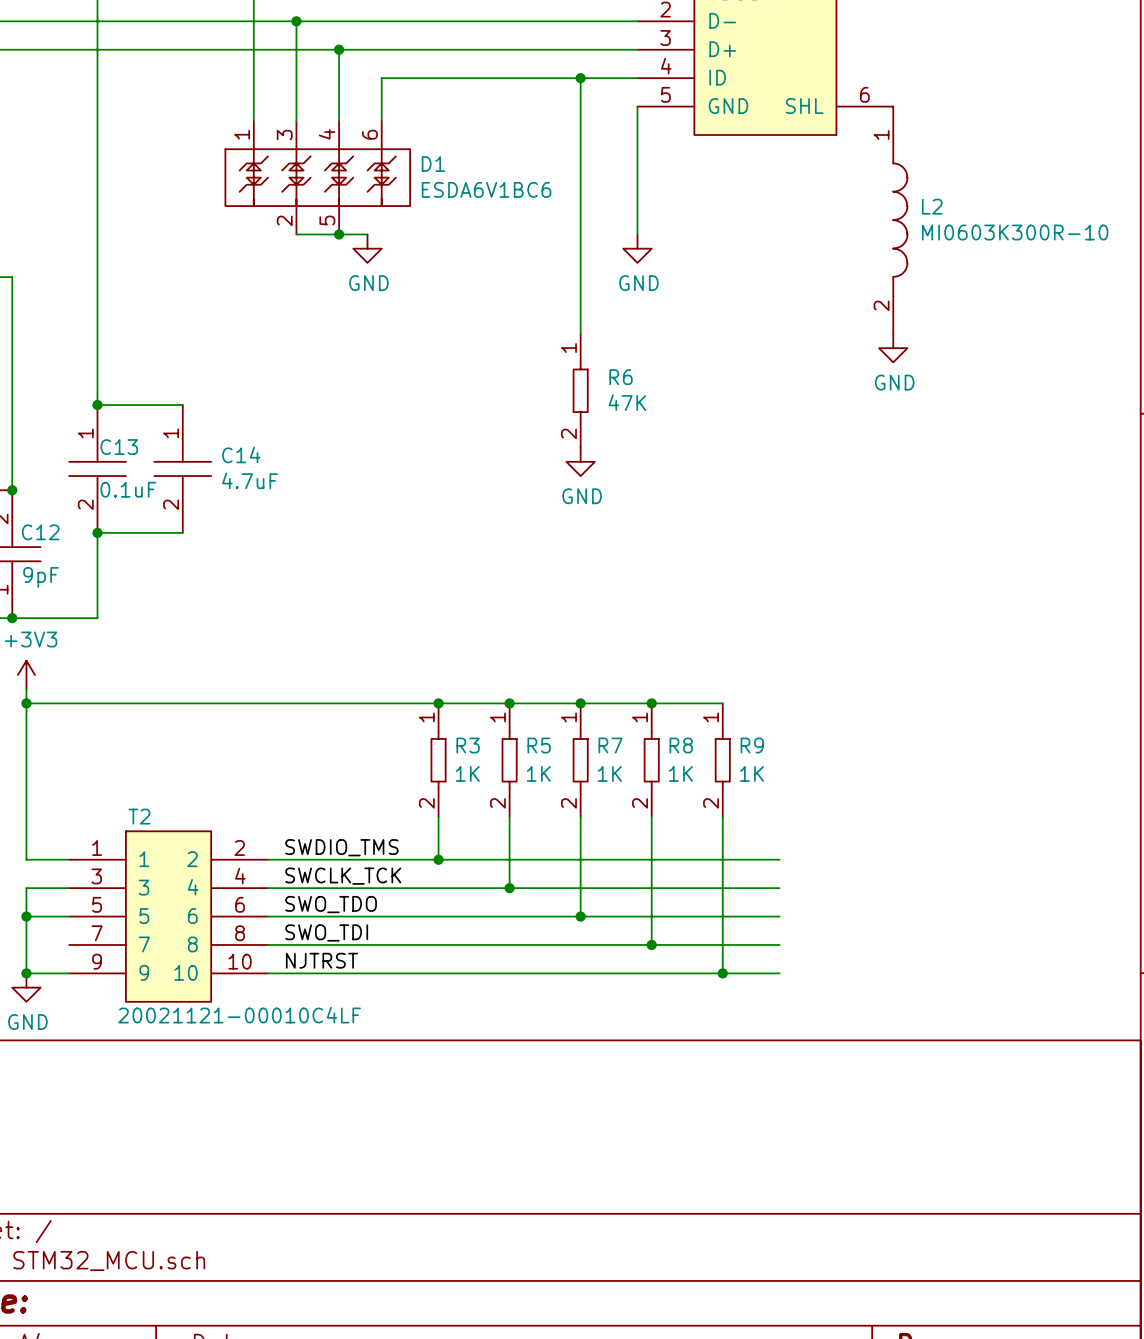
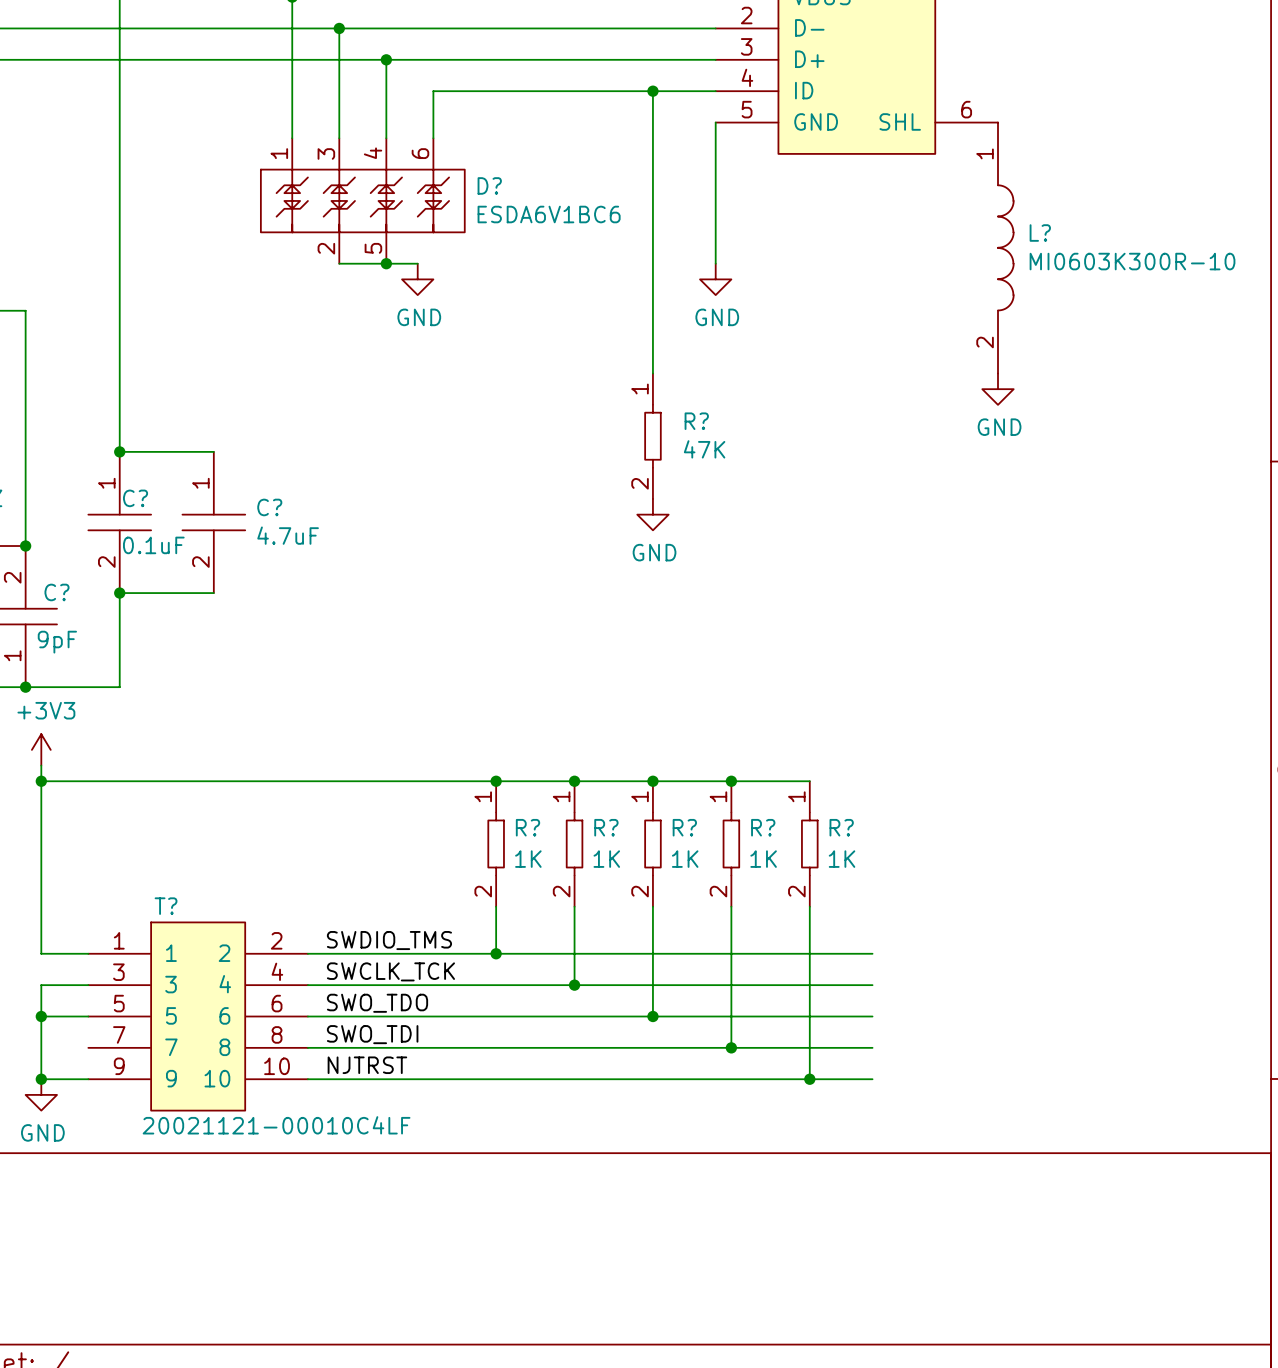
D1 name: D1 (433, 164) -> D? (489, 185)
L2 name: L2 (932, 206) -> L? (1040, 233)
R6 name: R6 (621, 377) -> R? (696, 421)
C13 name: C13 (119, 447) -> C? (135, 498)
C14 name: C14 (241, 455) -> C? (269, 507)
C12 name: C12 (40, 532) -> C? (57, 592)
R3 name: R3 (468, 745) -> R? (527, 827)
R5 name: R5 (539, 745) -> R? (606, 827)
R7 name: R7 (610, 745) -> R? (684, 827)
R8 name: R8 (681, 745) -> R? (763, 827)
R9 name: R9 (752, 745) -> R? (841, 827)
T2 name: T2 (139, 816) -> T? (166, 906)

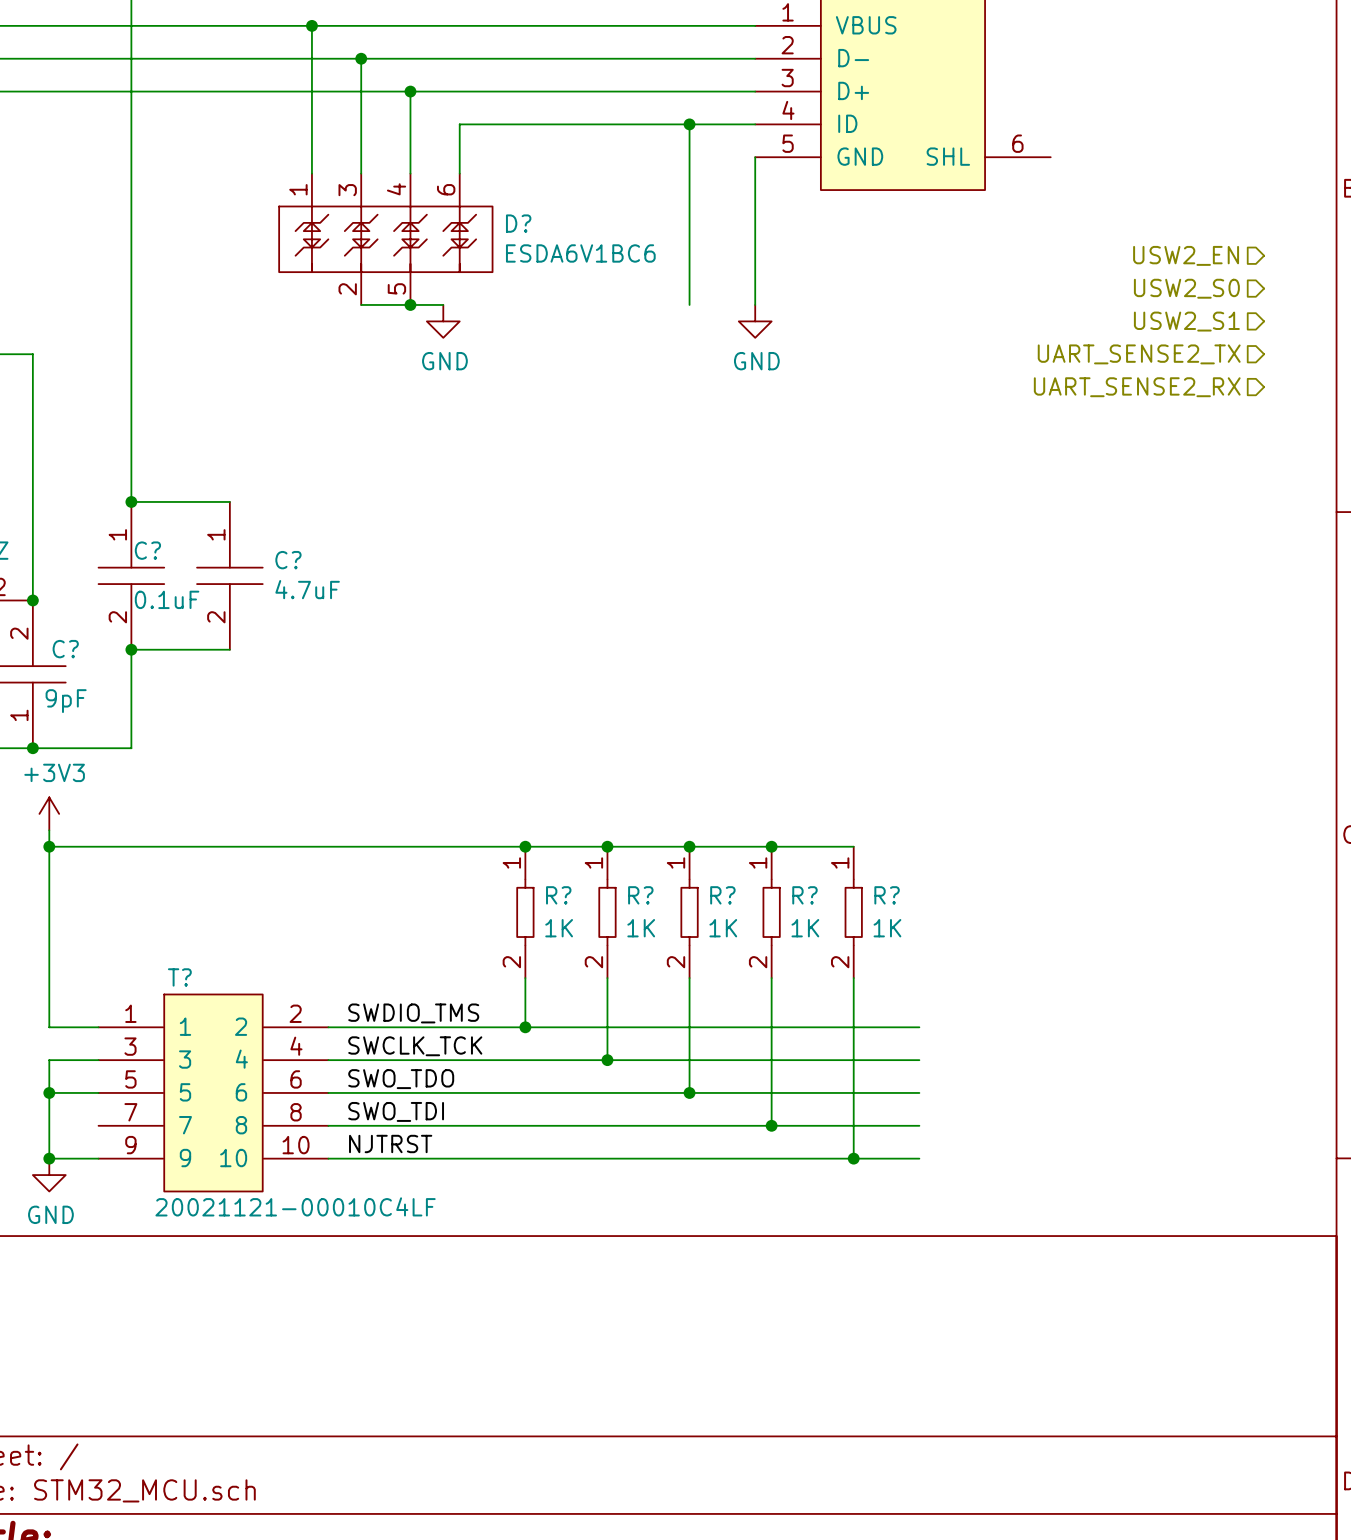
hierarchical label: none -> USW2_EN (1186, 255)
L?: (1005, 248) -> none
hierarchical label: none -> USW2_S0 (1186, 288)
wire: (652, 263) (652, 373) -> none
hierarchical label: none -> USW2_S1 (1186, 321)
hierarchical label: none -> UART_SENSE2_TX (1139, 354)
hierarchical label: none -> UART_SENSE2_RX (1137, 387)
power symbol: GND (998, 389) -> none
R?: (652, 436) -> none
power symbol: GND (652, 514) -> none

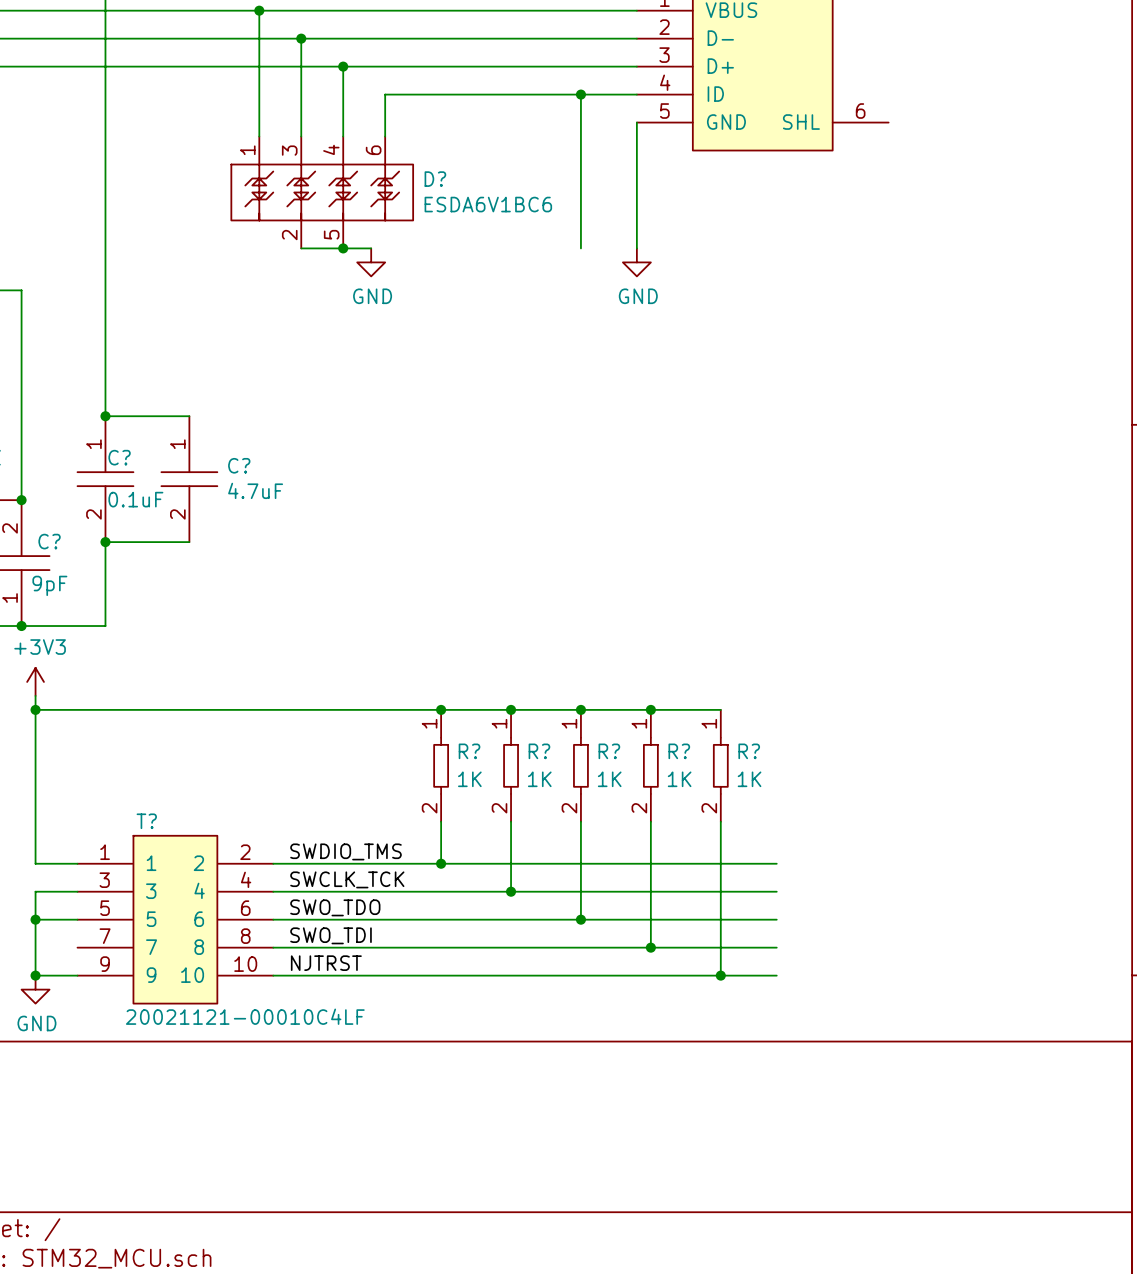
hierarchical label: USW2_EN (1186, 255) -> none
hierarchical label: USW2_S0 (1186, 288) -> none
hierarchical label: USW2_S1 (1186, 321) -> none
hierarchical label: UART_SENSE2_TX (1139, 354) -> none
hierarchical label: UART_SENSE2_RX (1137, 387) -> none

